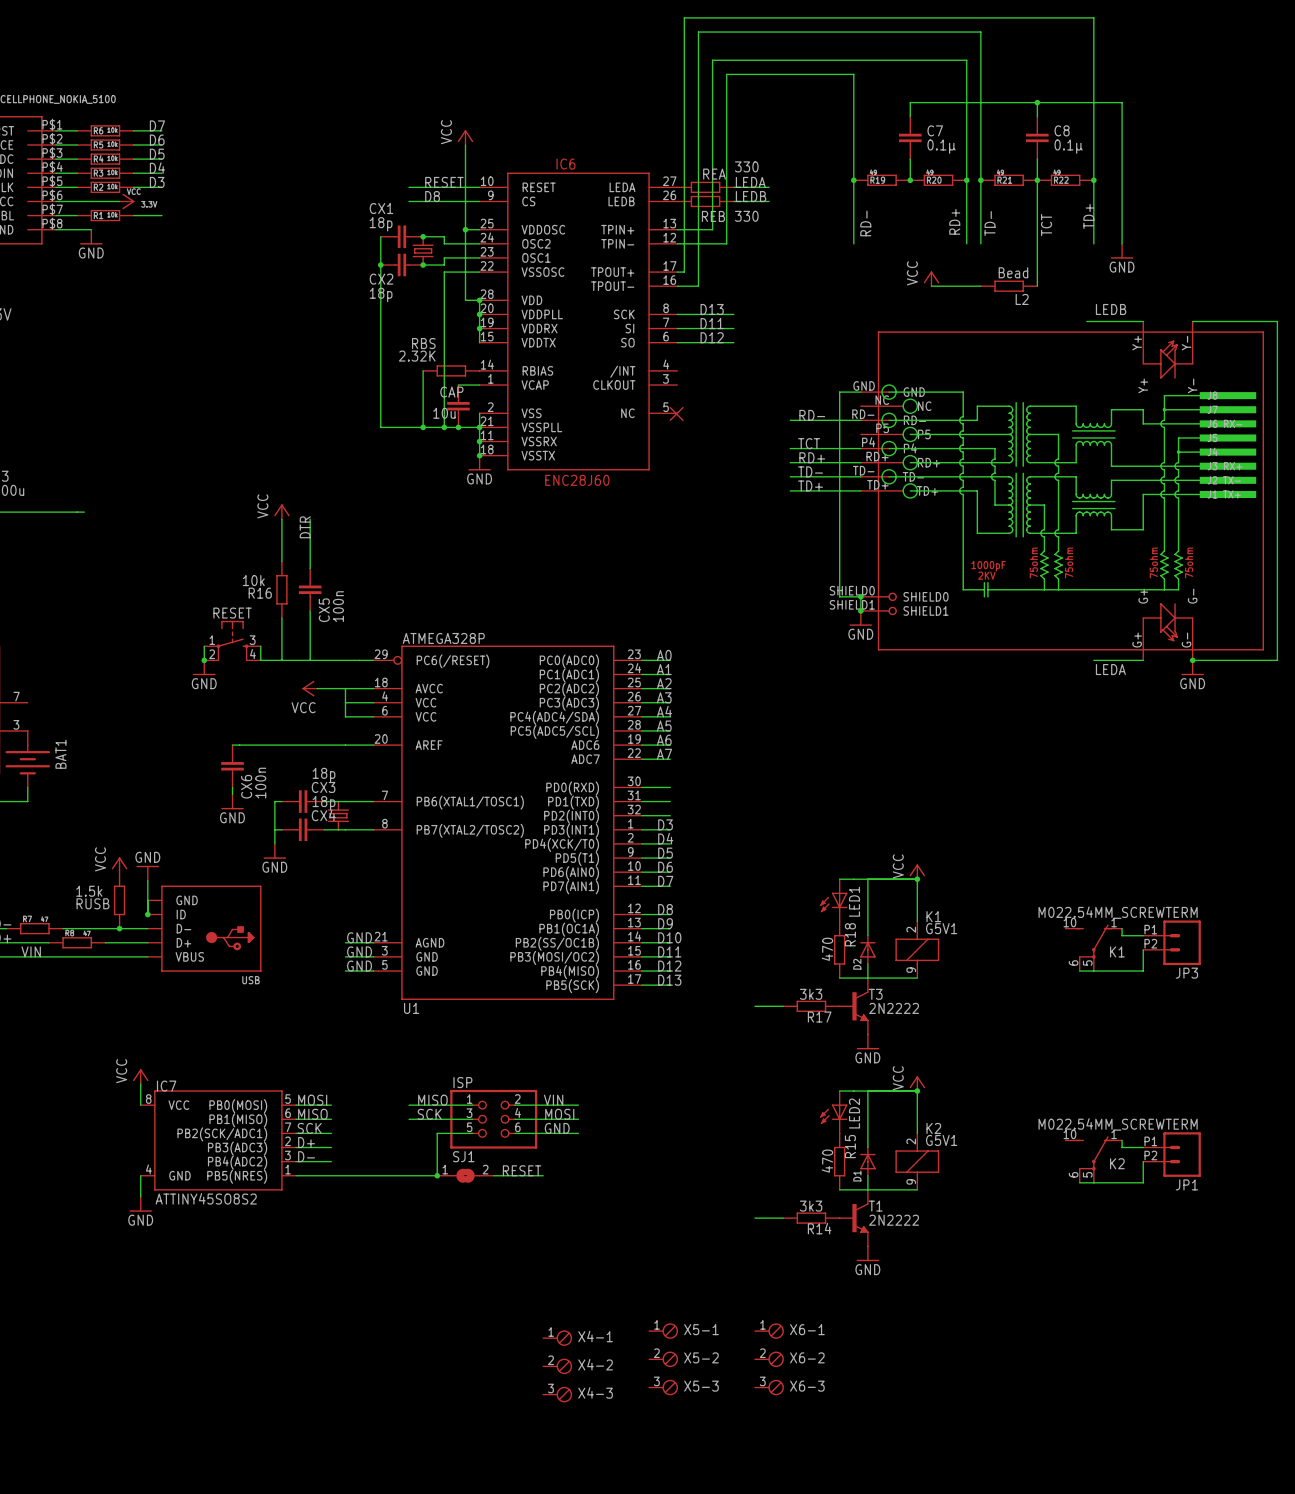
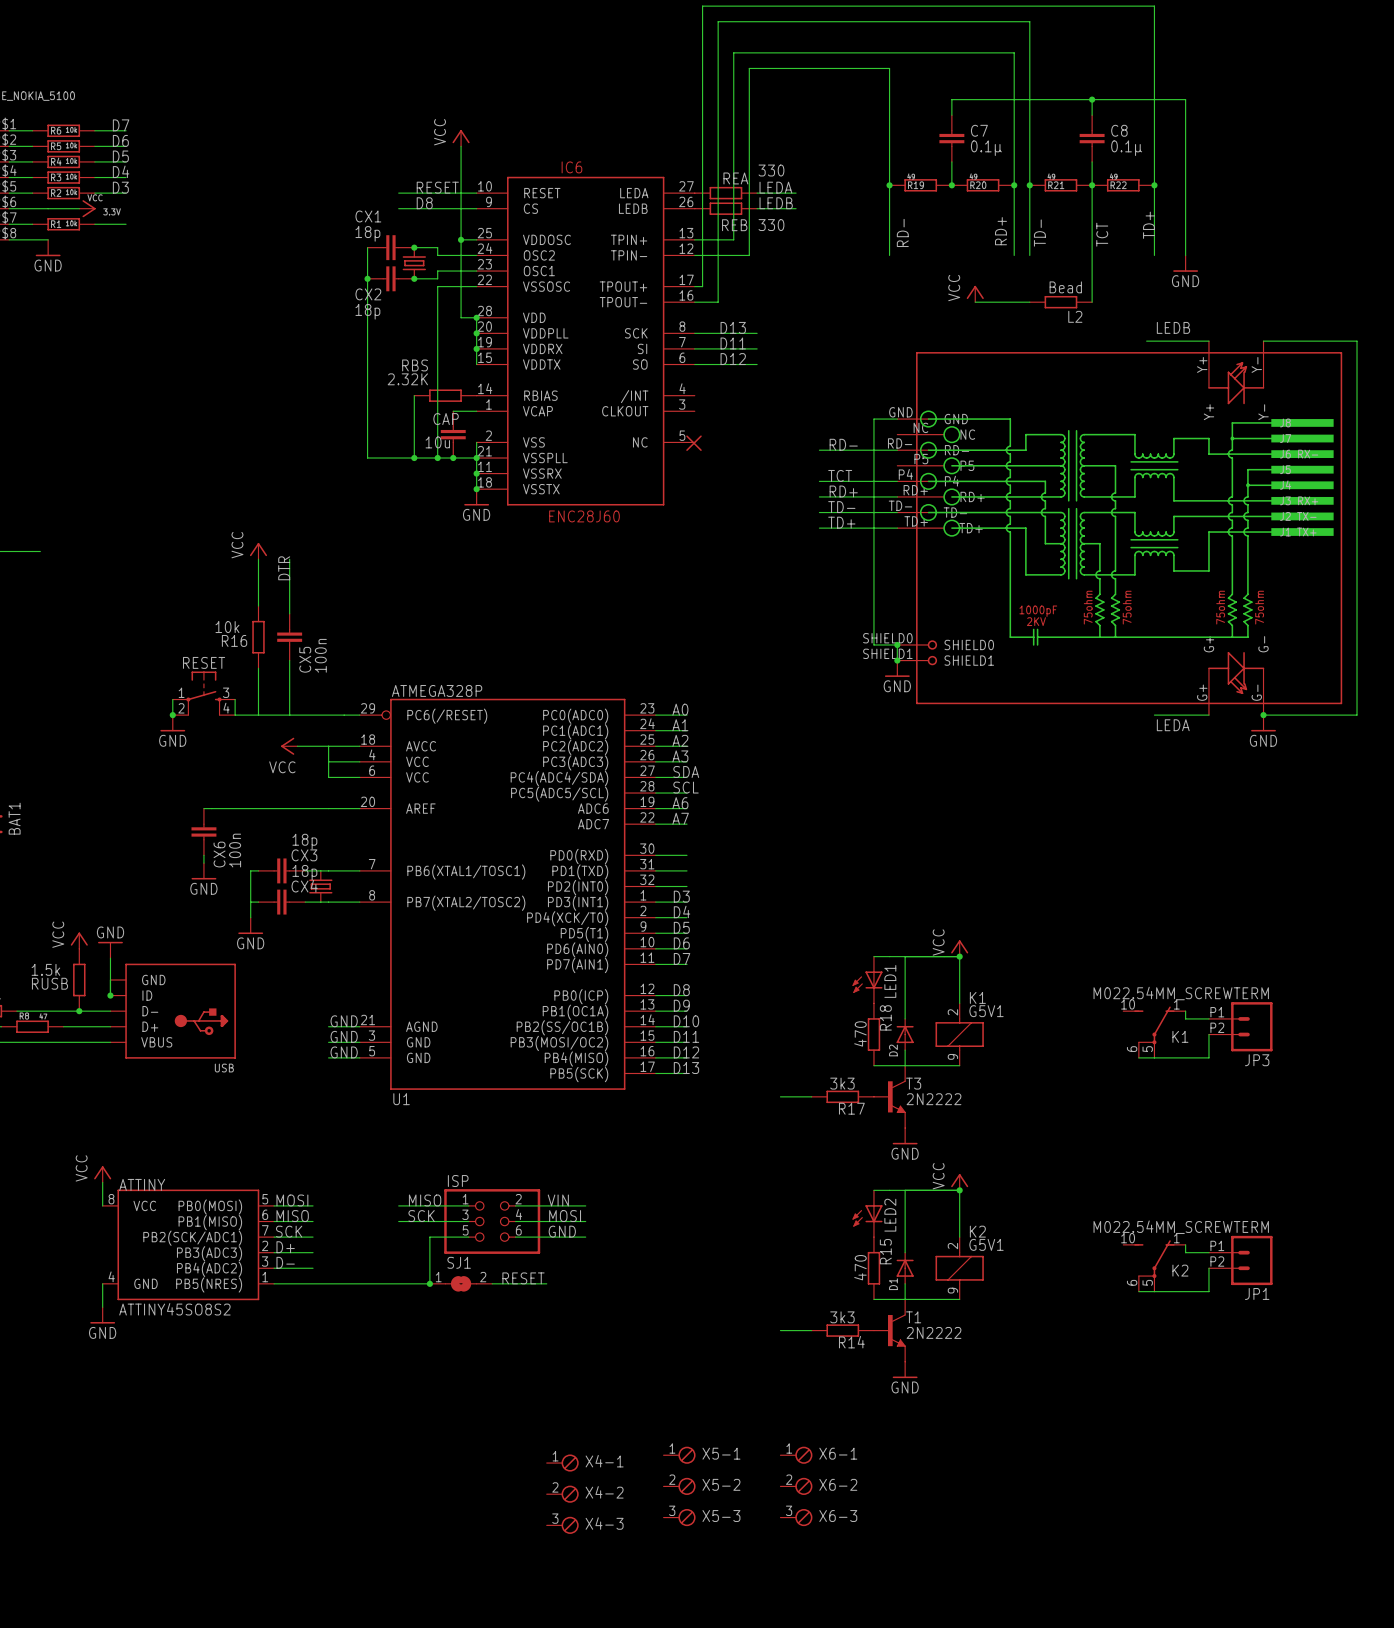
label: A4 (664, 711) -> SDA (686, 771)
label: A5 (664, 726) -> SCL (686, 787)
IC7 name: IC7 (166, 1086) -> ATTINY (142, 1184)

